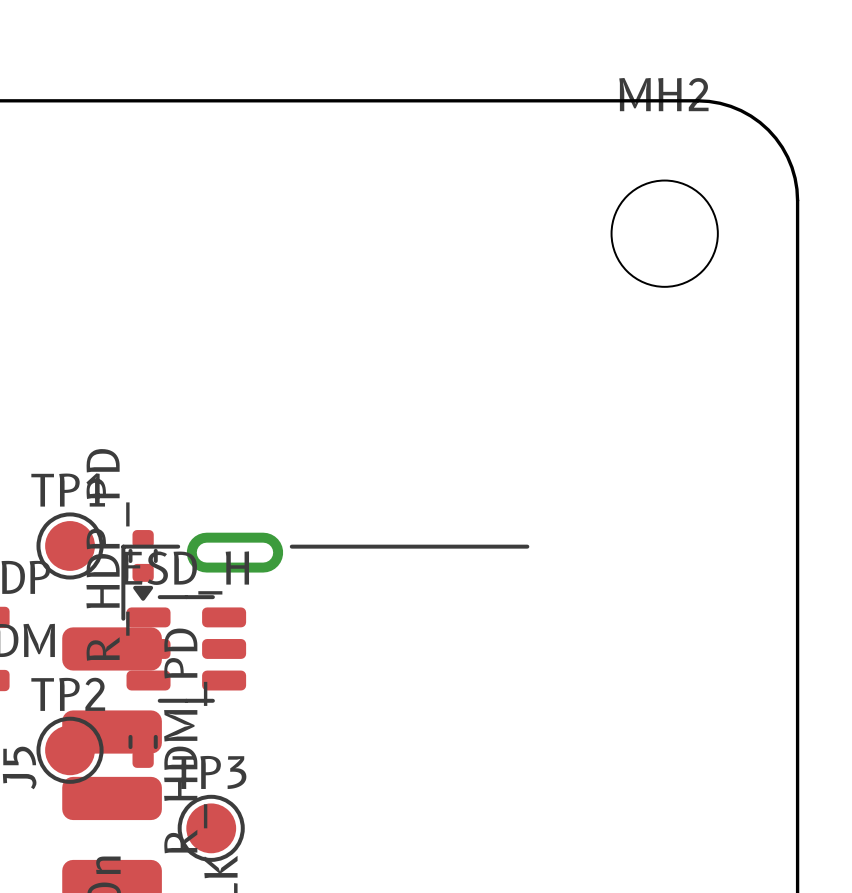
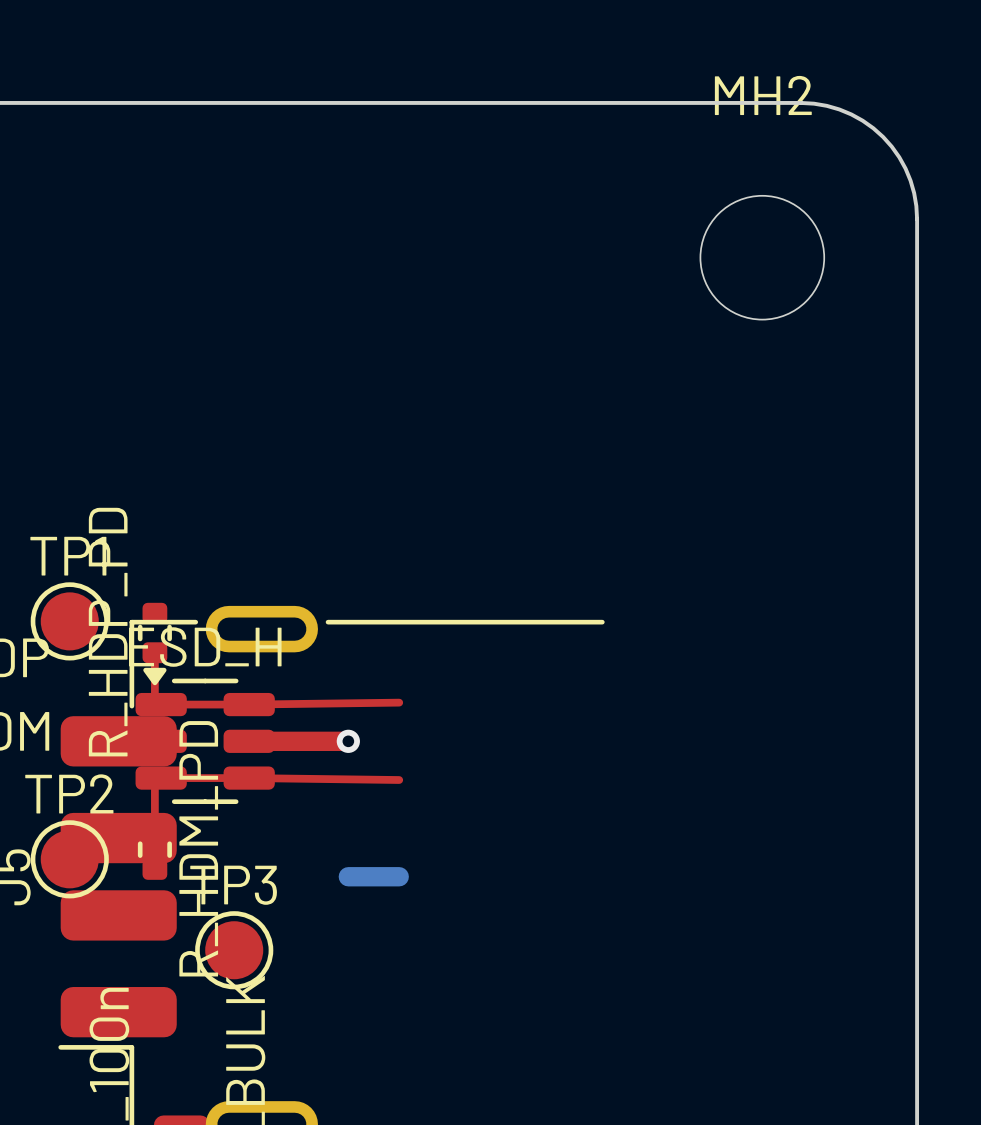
top track: none -> (154, 652) (154, 704) (399, 702)
top track: none -> (249, 741) (348, 741)
via: none -> (348, 741)
top track: none -> (399, 780) (154, 778) (154, 829)
bottom track: none -> (348, 876) (399, 876)

